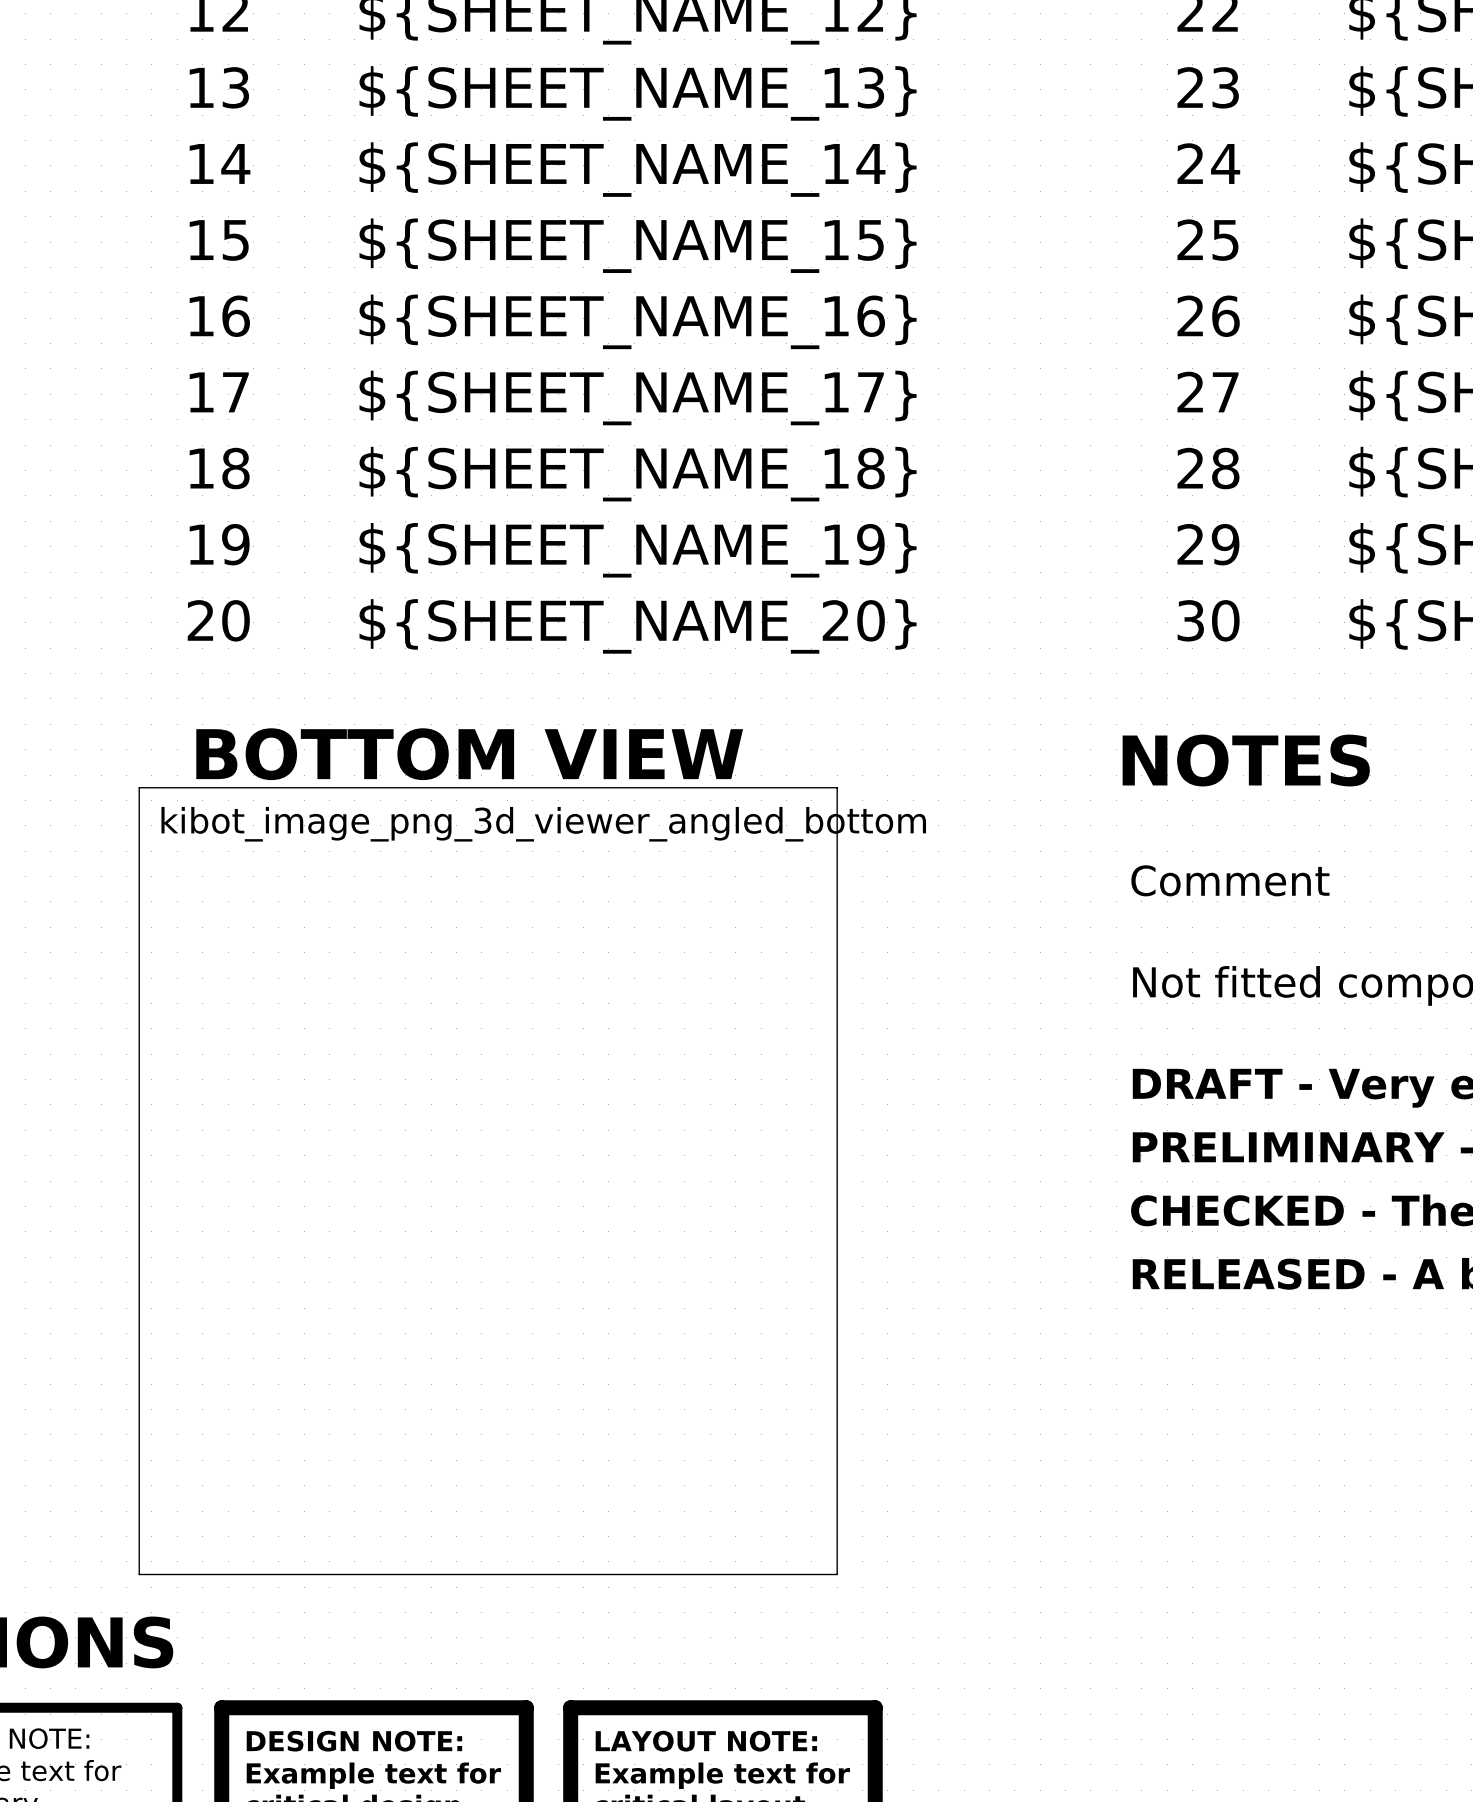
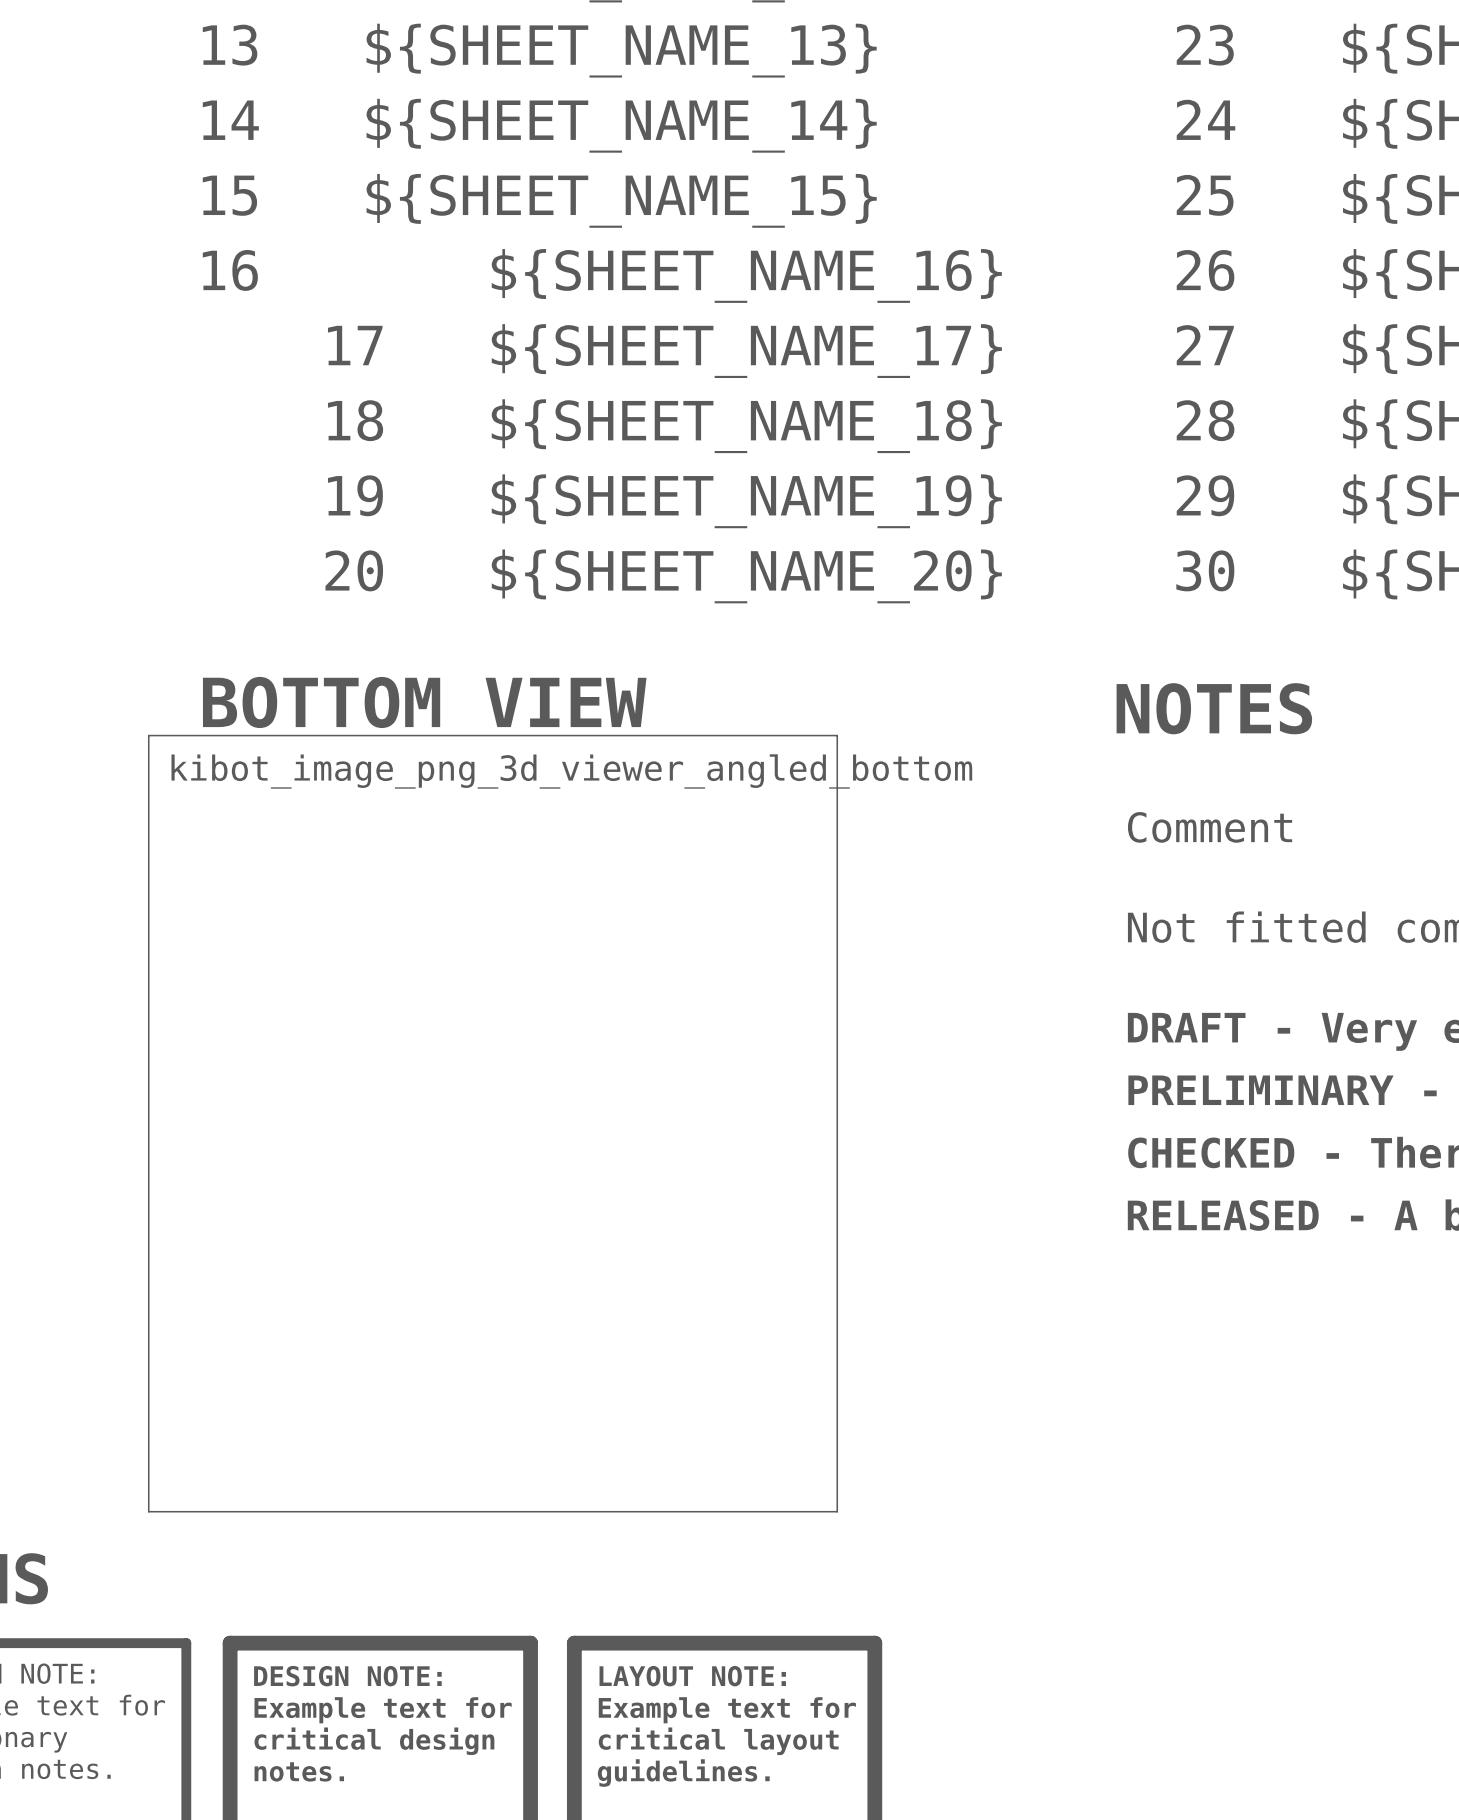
text position: ${SHEET_NAME_16} (638, 321) -> ${SHEET_NAME_16} (746, 275)
text position: 17 (219, 392) -> 17 (355, 345)
text position: ${SHEET_NAME_17} (638, 397) -> ${SHEET_NAME_17} (746, 351)
text position: 18 (219, 468) -> 18 (355, 420)
text position: ${SHEET_NAME_18} (638, 474) -> ${SHEET_NAME_18} (746, 426)
text position: 19 (219, 544) -> 19 (355, 495)
text position: ${SHEET_NAME_19} (638, 550) -> ${SHEET_NAME_19} (746, 501)
text position: 20 (218, 620) -> 20 (354, 570)
text position: ${SHEET_NAME_20} (638, 626) -> ${SHEET_NAME_20} (746, 576)

